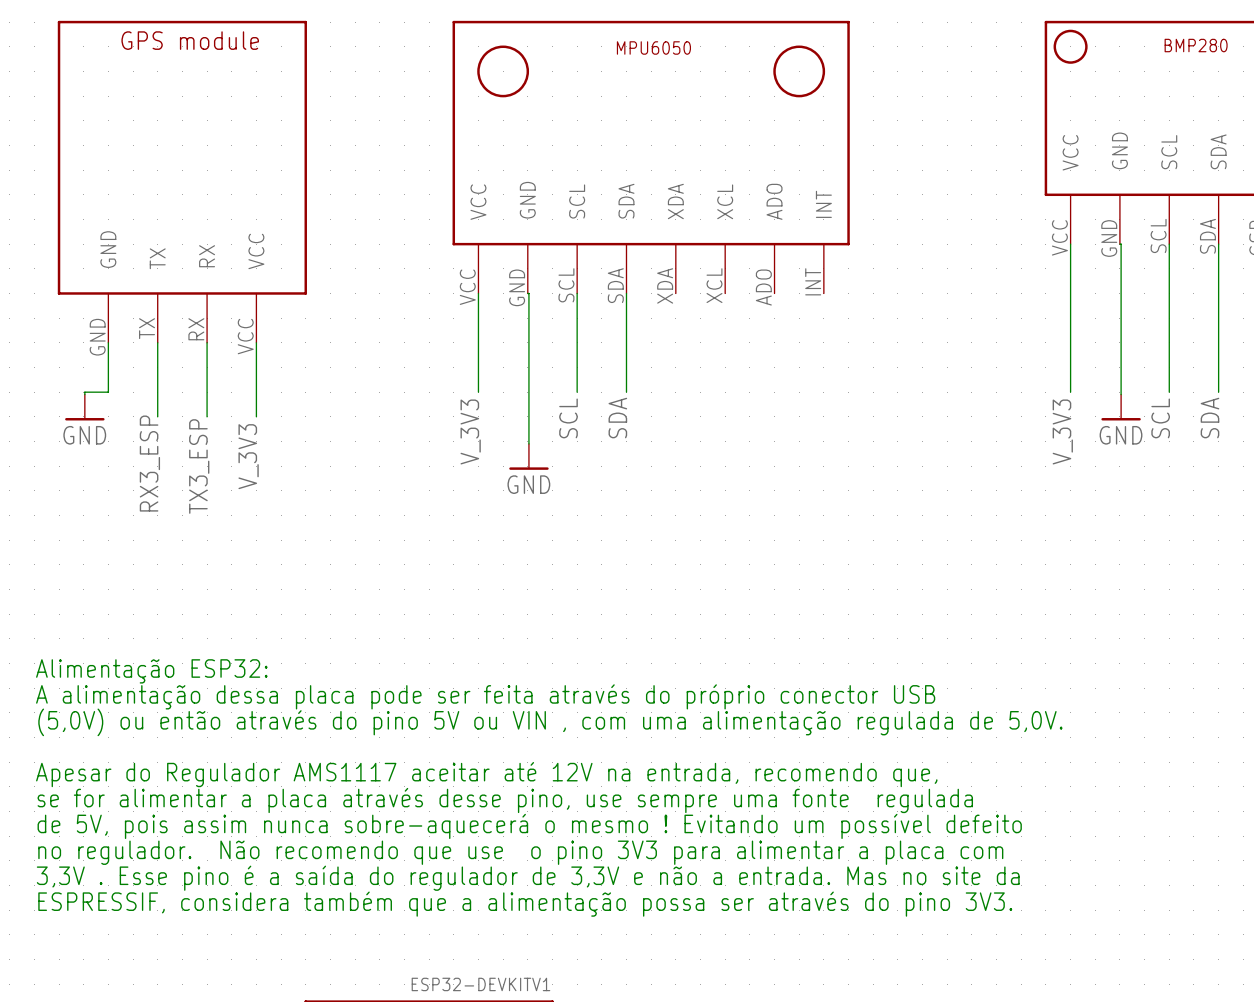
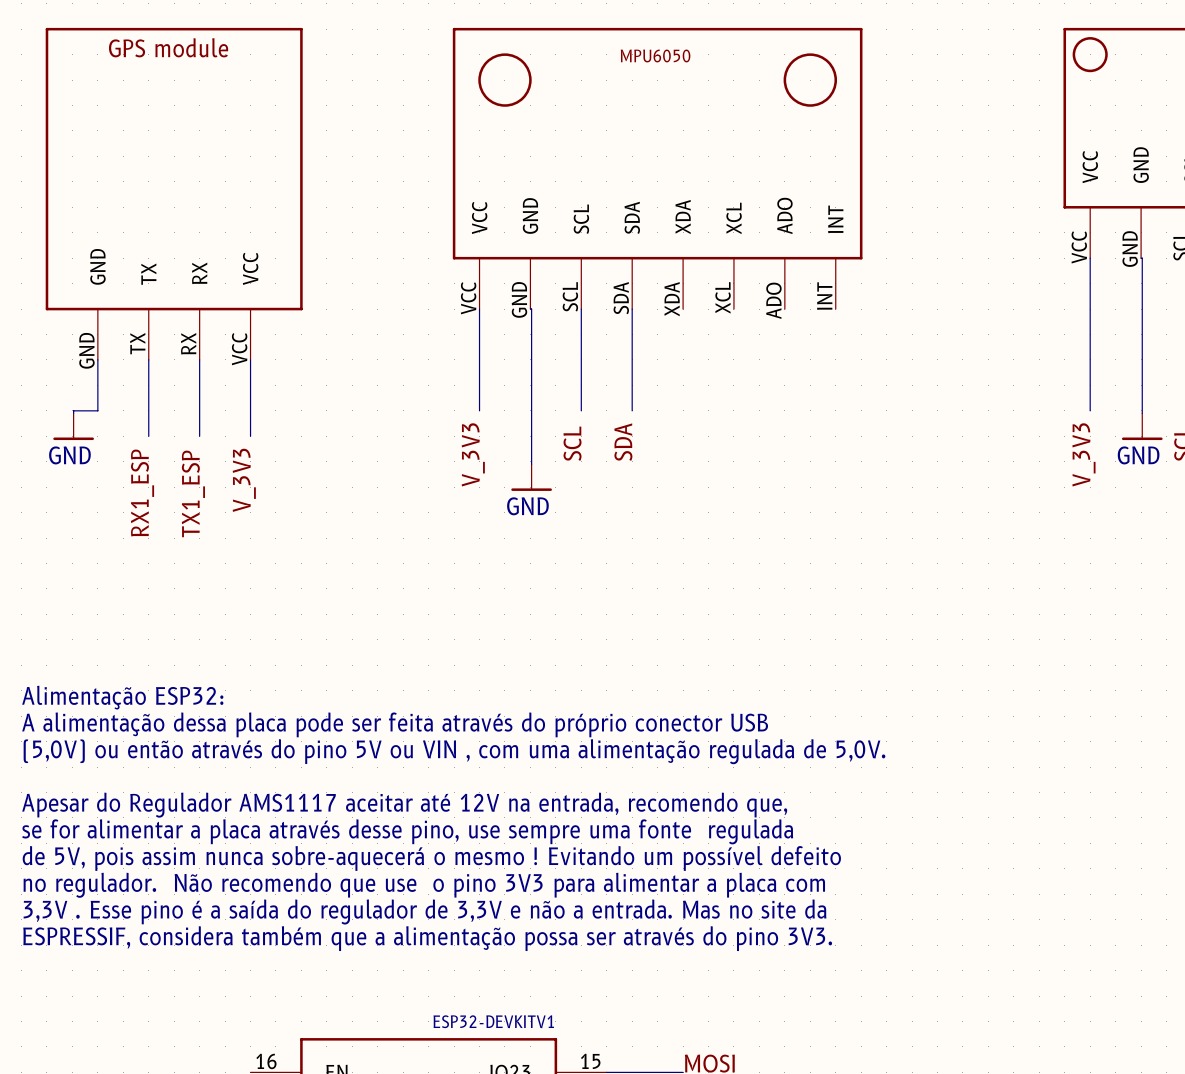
label: RX3_ESP (149, 463) -> RX1_ESP (142, 493)
label: TX3_ESP (199, 466) -> TX1_ESP (193, 493)

